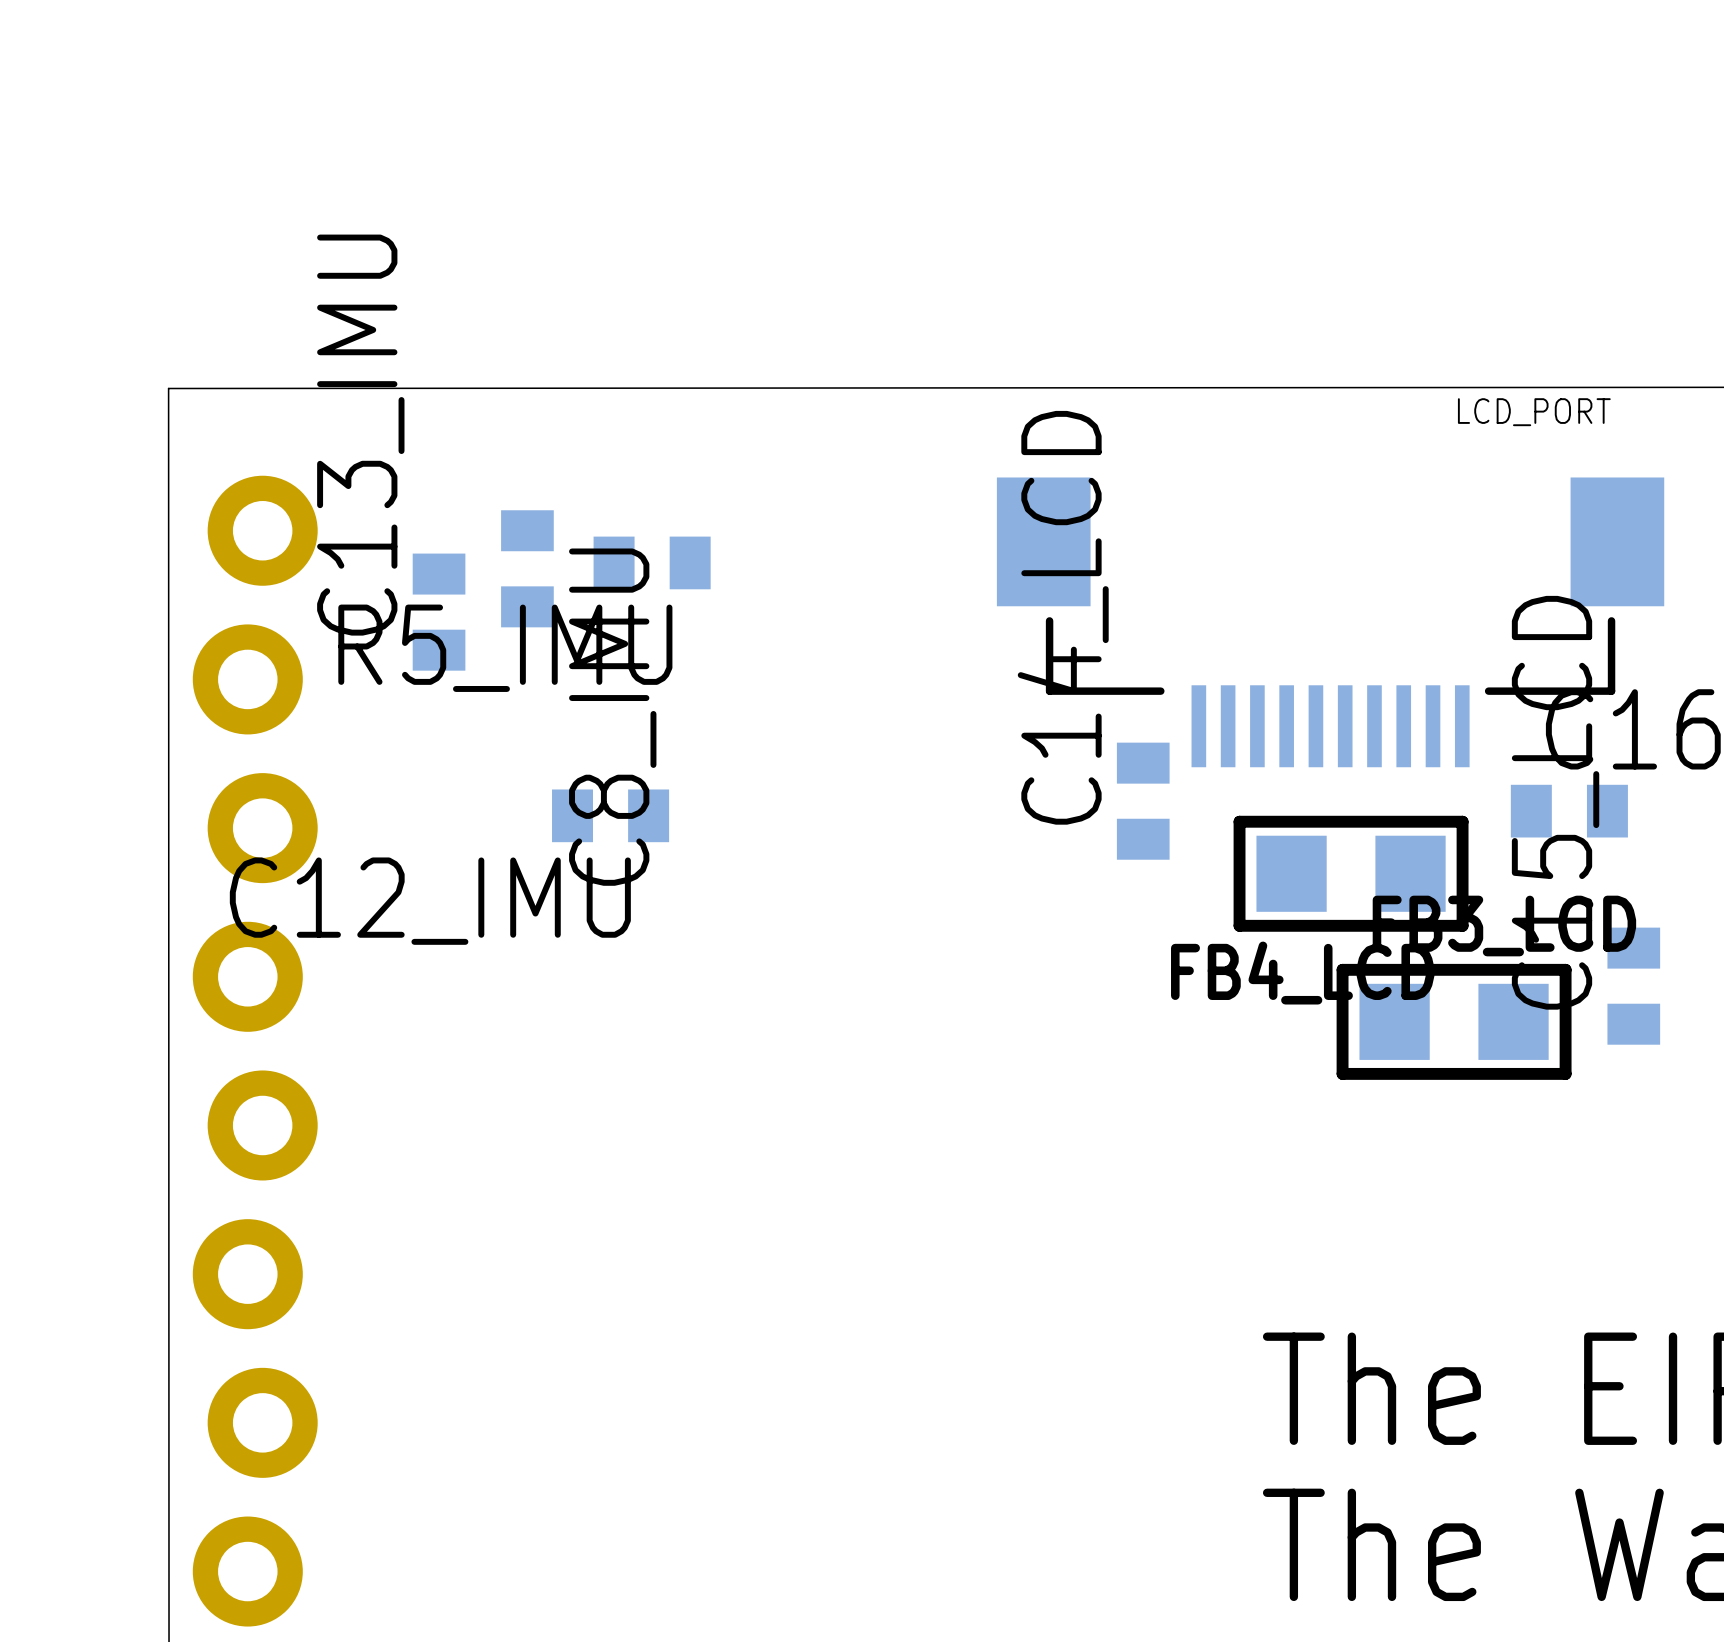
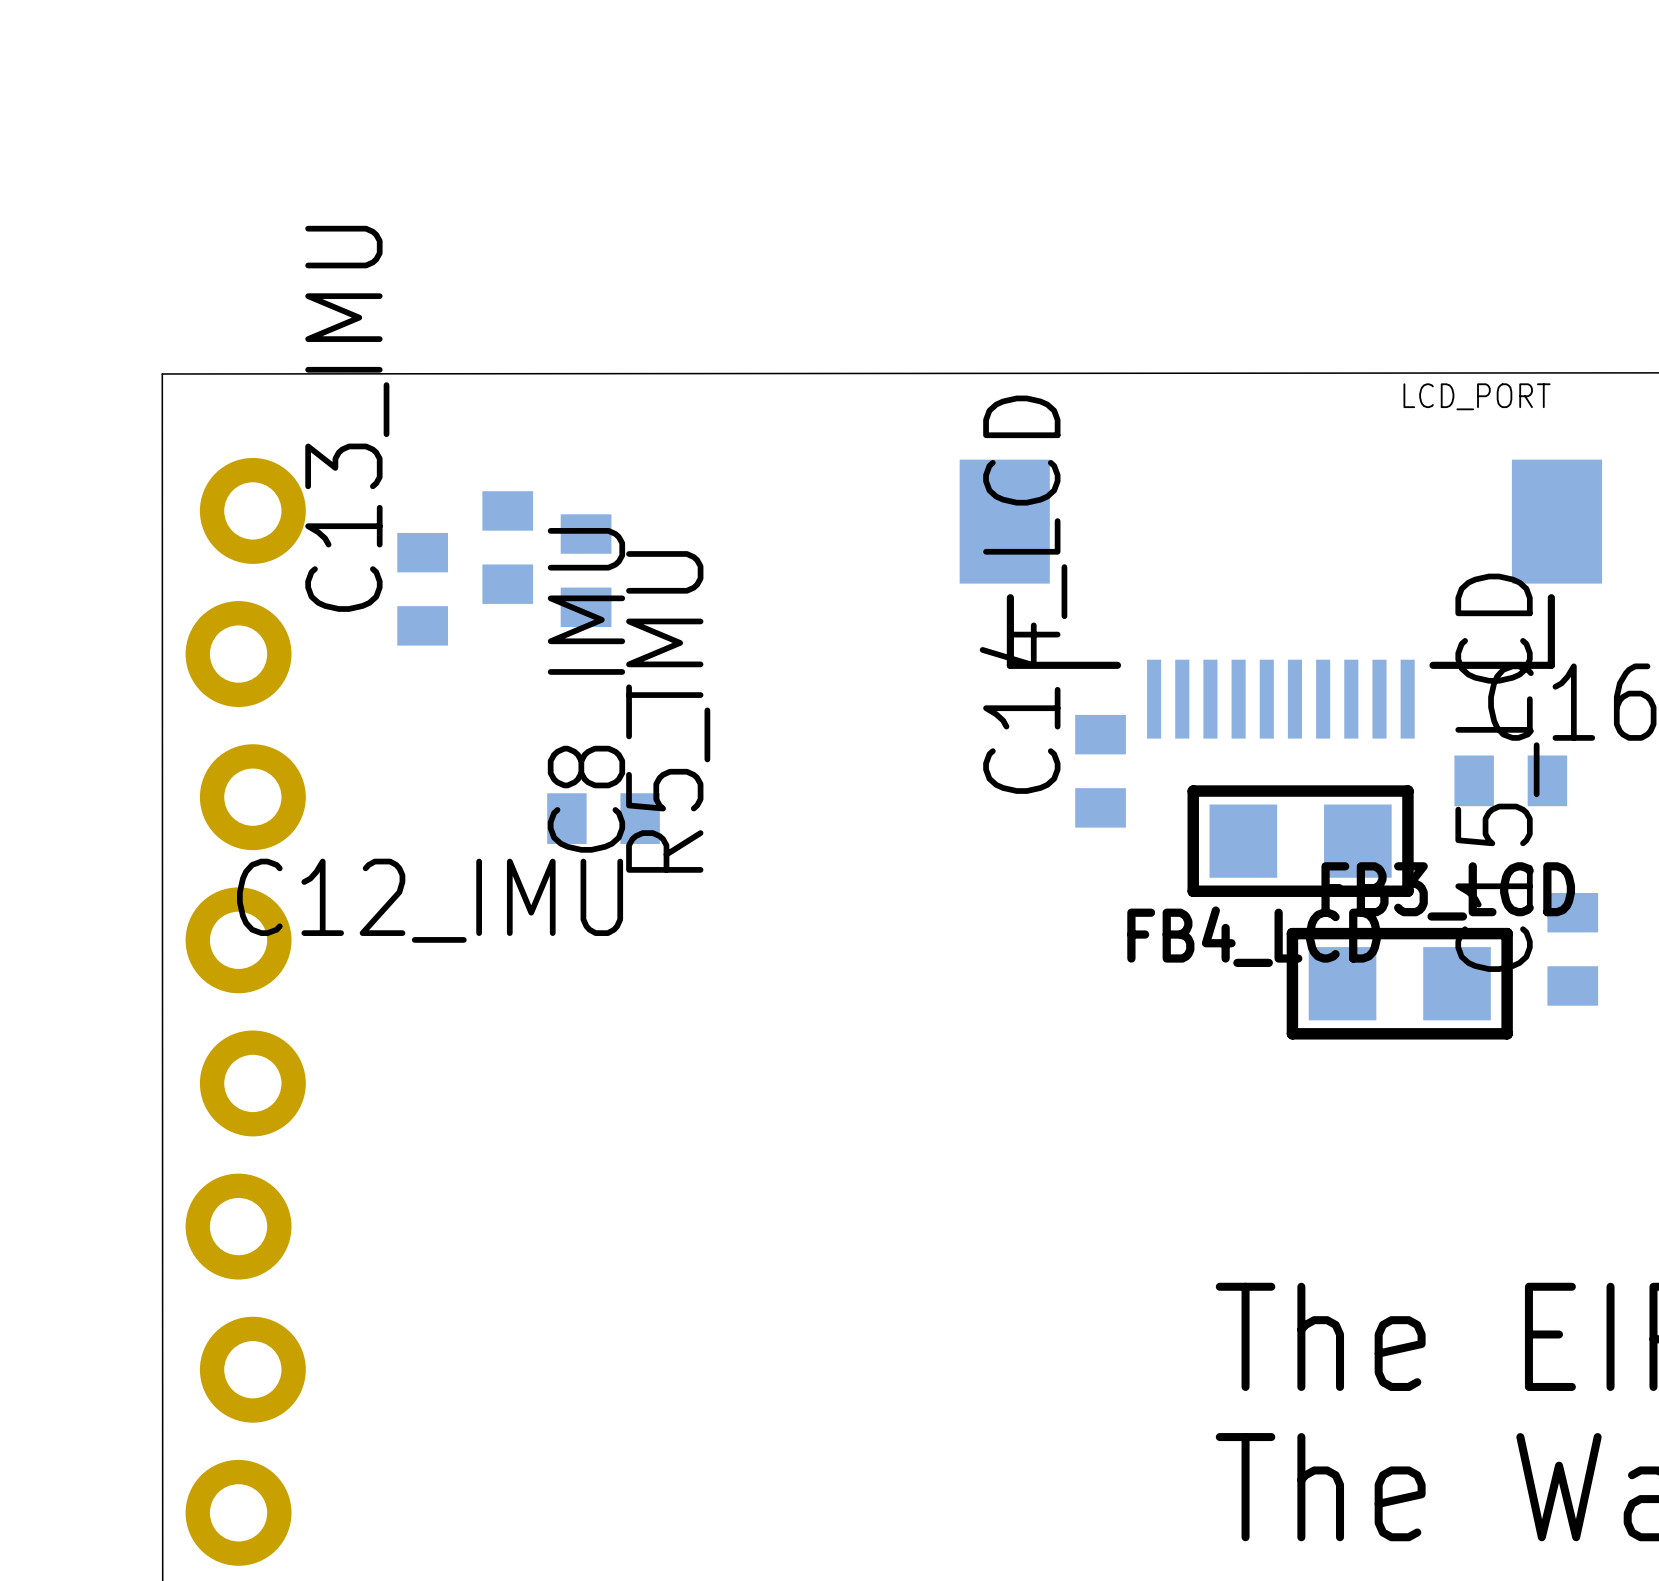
R5_IMU rotation: 0° (652, 562) -> 90° clockwise (586, 570)
R5_IMU name position: R5_IMU (505, 648) -> R5_IMU (668, 711)
C12_IMU position: (610, 815) -> (603, 818)

